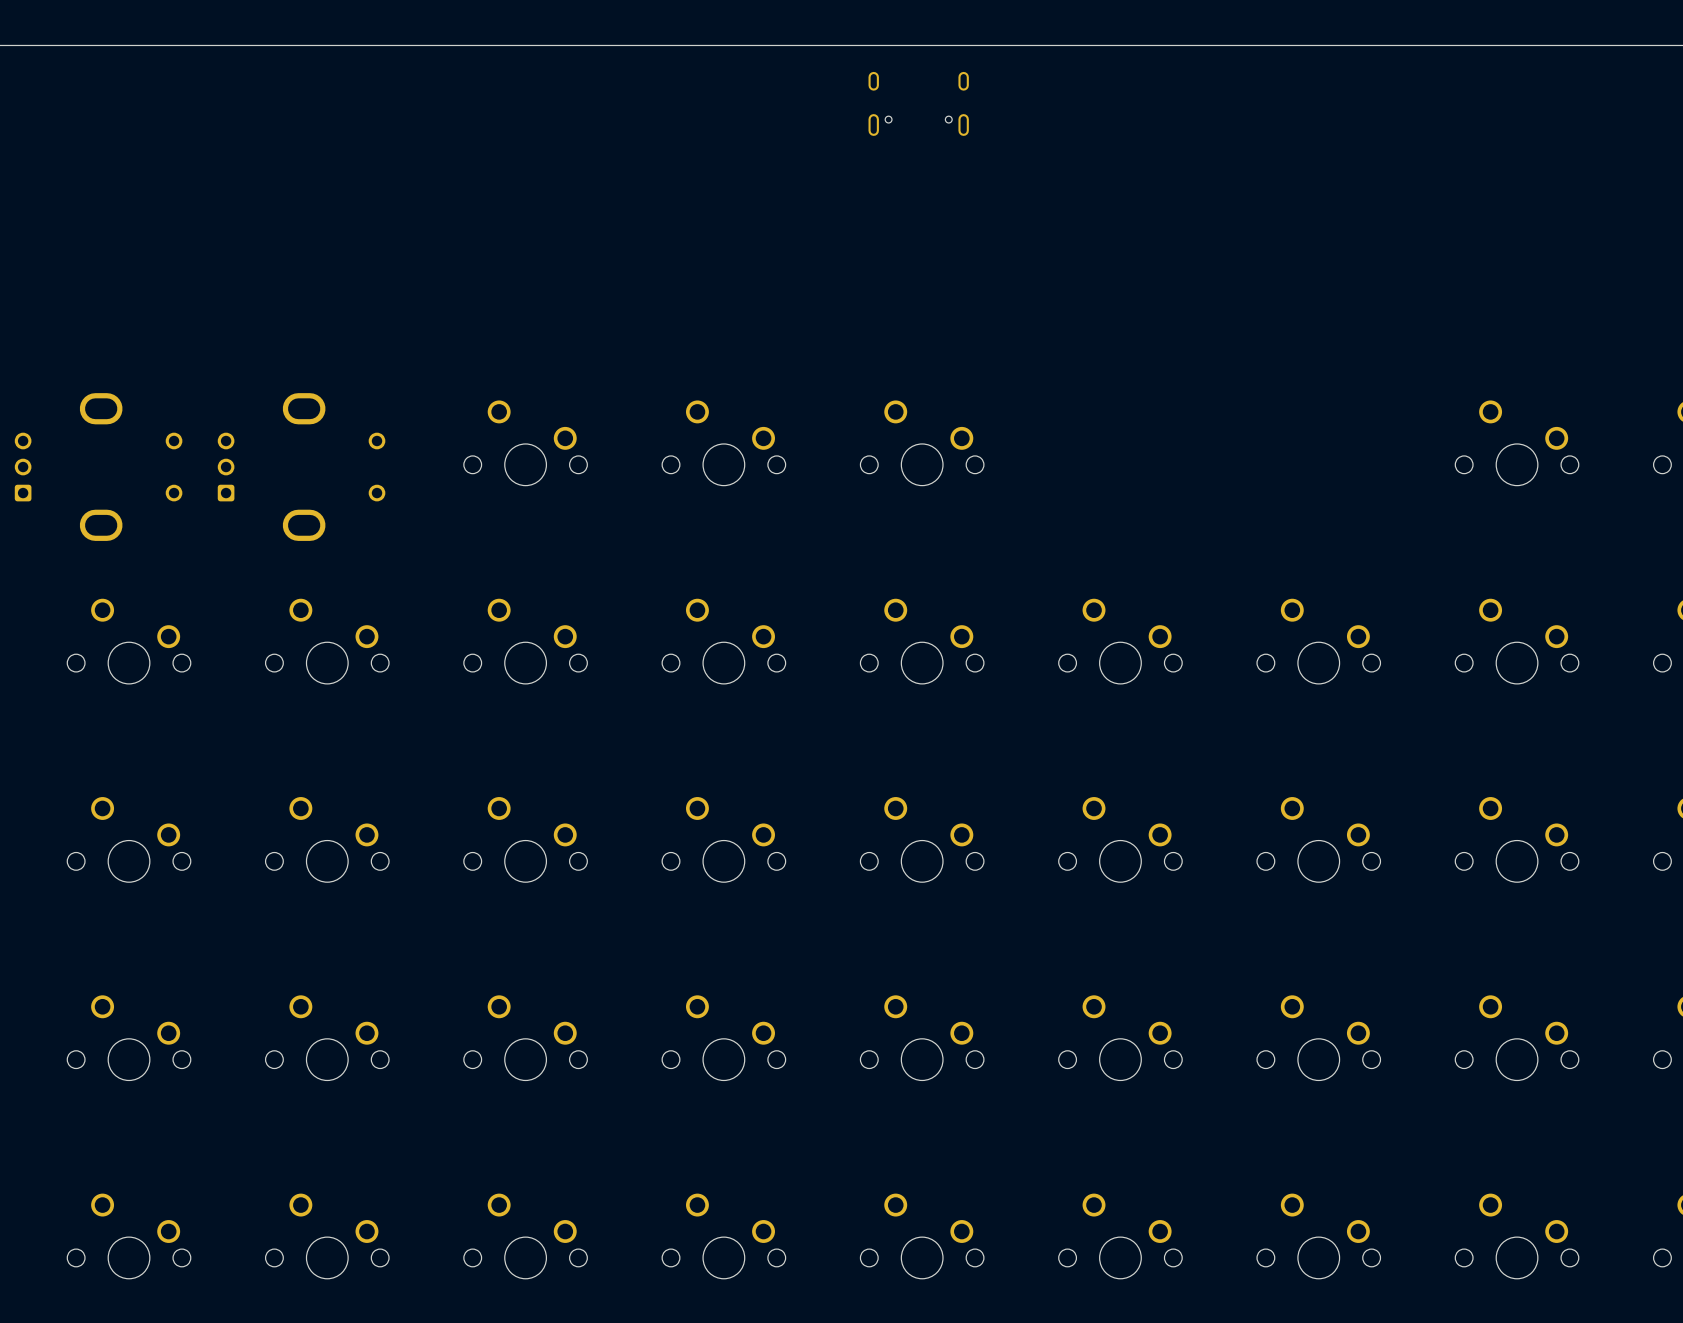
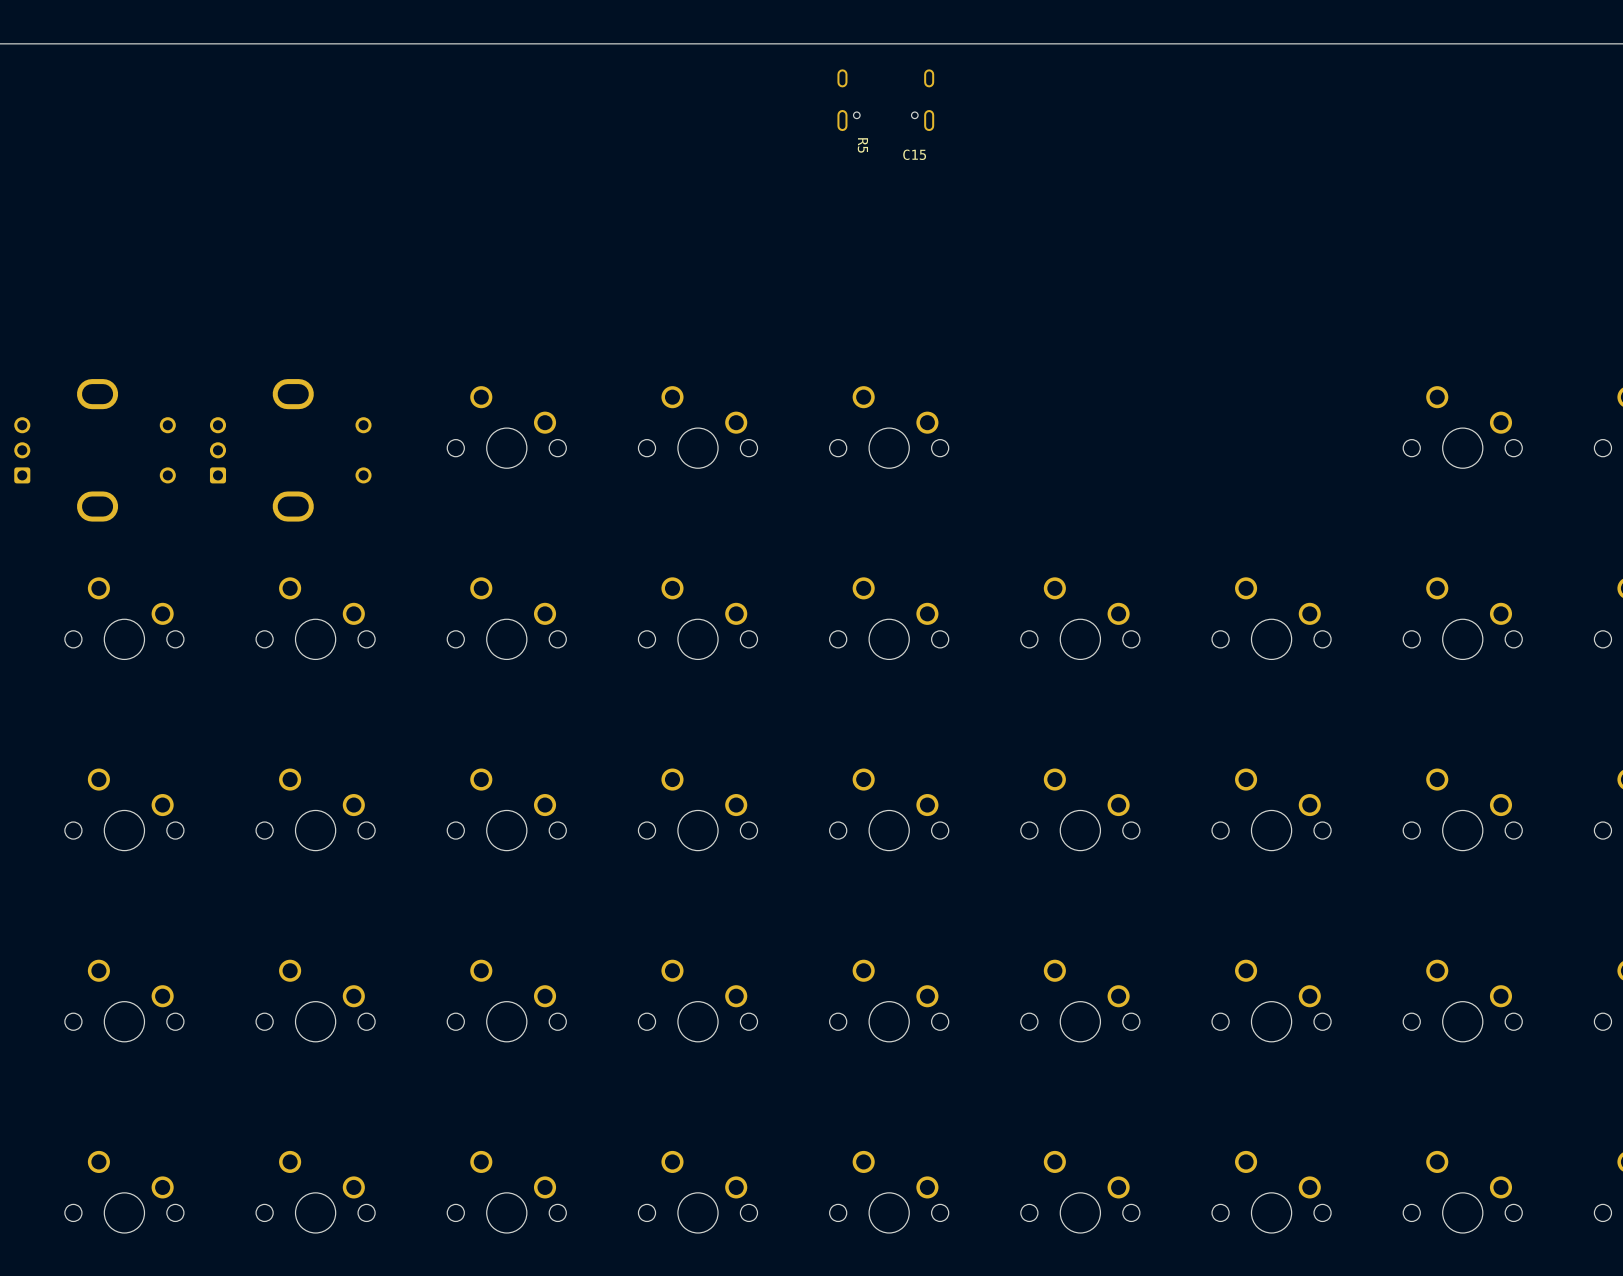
R5: none -> (862, 145)
C15: none -> (914, 154)

